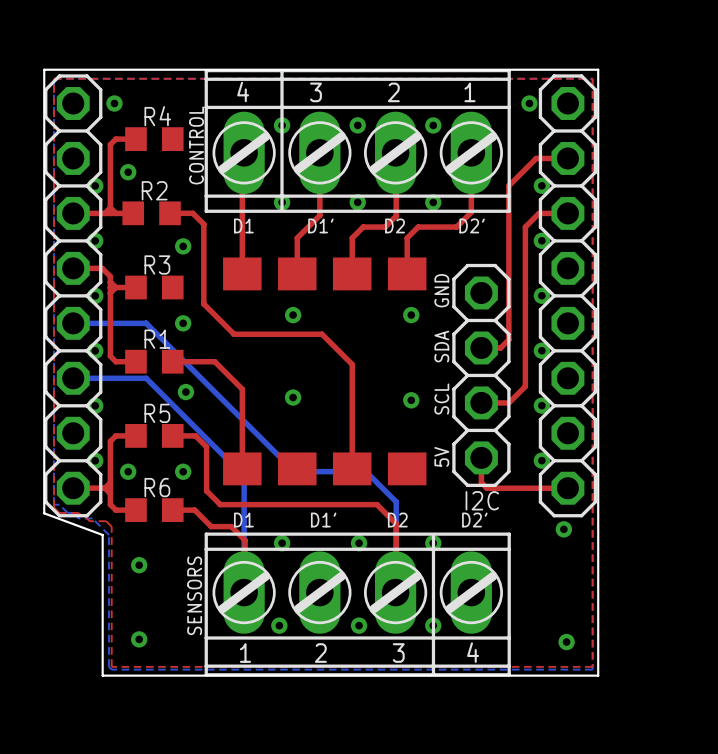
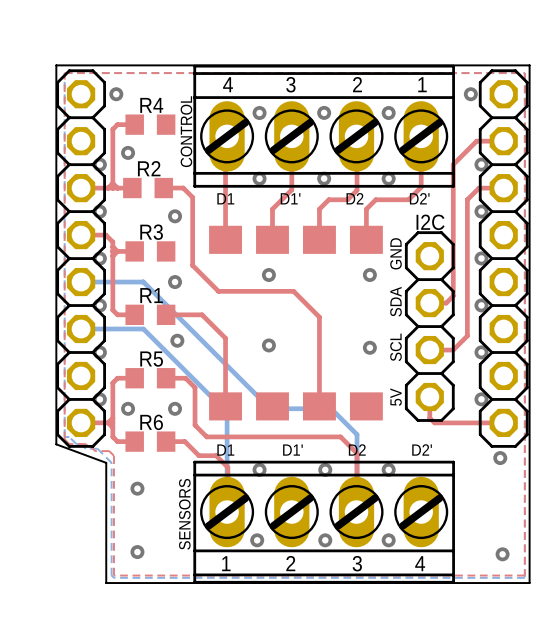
CONTROL footprint: [204, 68, 511, 213] -> [193, 64, 455, 188]
I2C name position: I2C (482, 500) -> I2C (430, 222)
SENSORS footprint: [204, 532, 511, 677] -> [193, 460, 455, 584]

